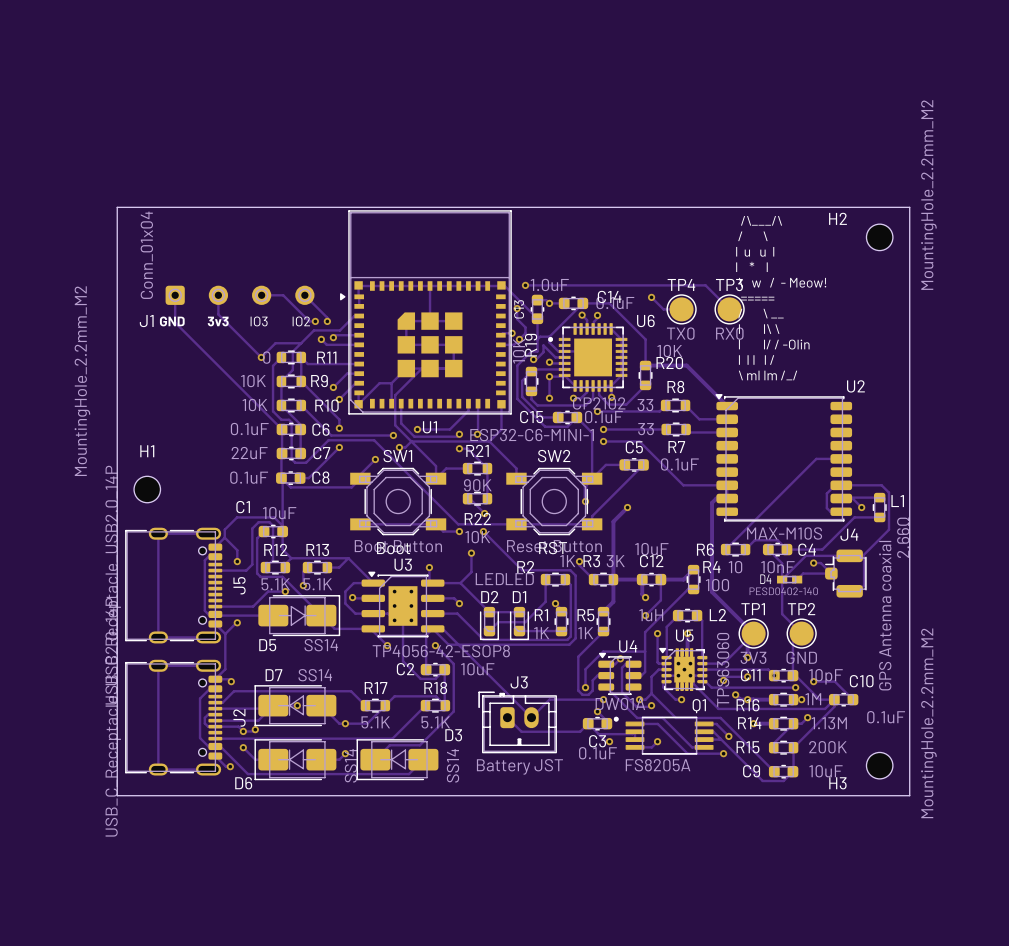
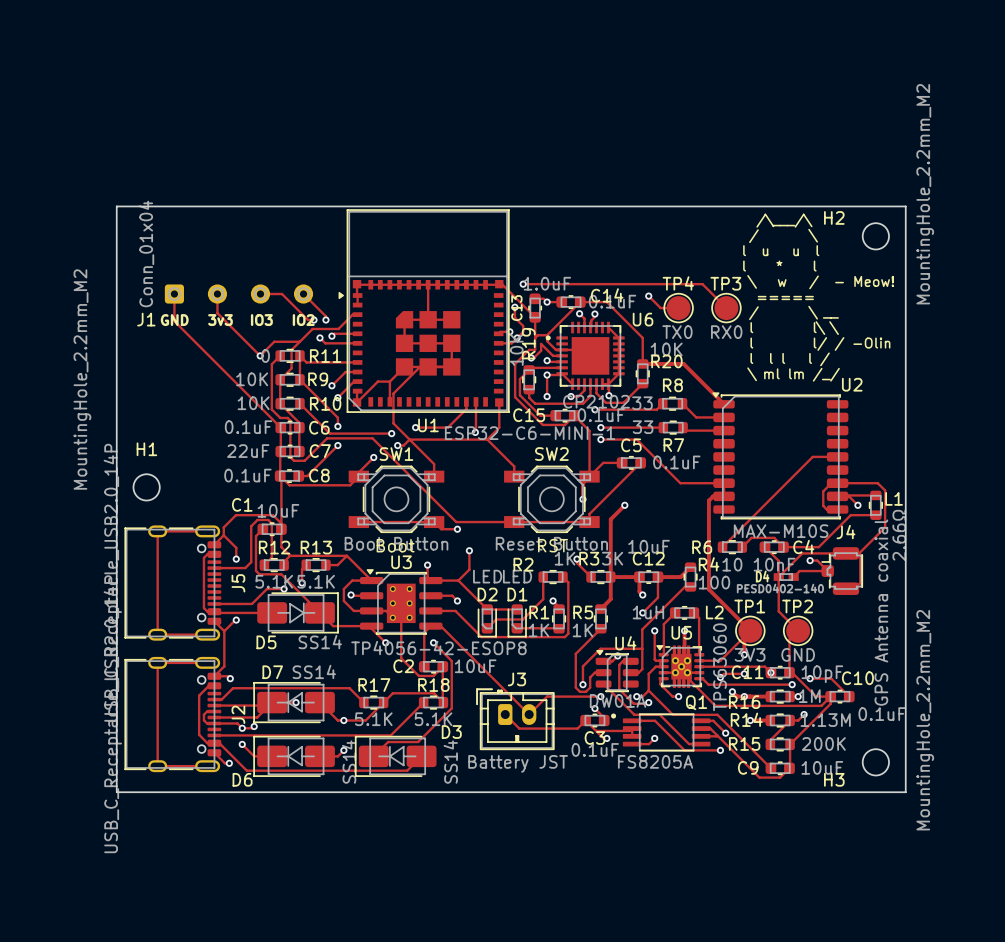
track: (401, 403) (401, 423) (414, 436) (457, 436) (459, 434) -> none
via: (459, 434) -> none
track: (459, 448) (467, 448) (487, 468) (487, 498) -> none
via: (459, 448) -> none
track: (467, 468) (446, 468) (436, 478) -> none
R21: 90K (477, 468) -> none
track: (467, 498) (484, 513) -> none
R22: 10K (477, 498) -> none
via: (484, 513) -> none
track: (483, 531) (522, 570) (570, 570) (575, 575) (575, 638) (569, 644) (448, 644) (432, 628) -> none
via: (483, 531) -> none

